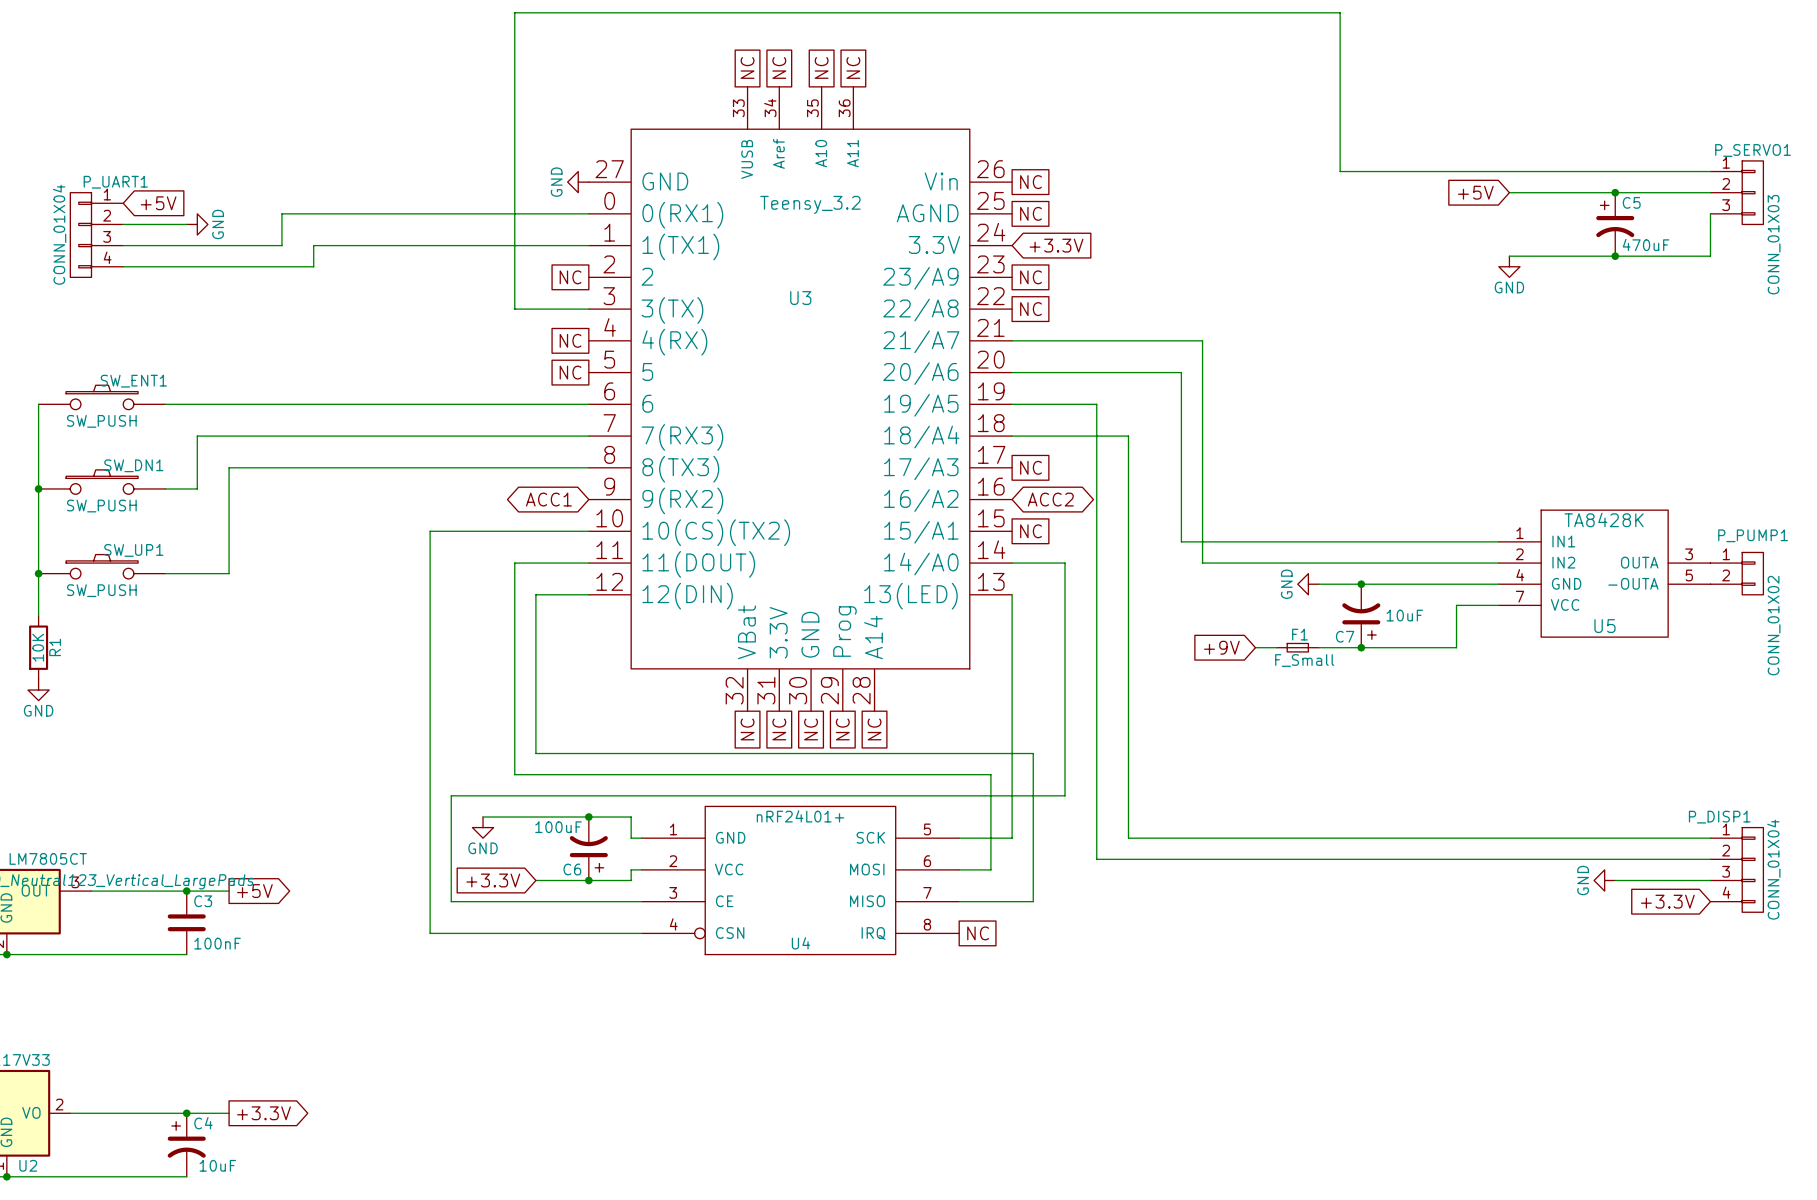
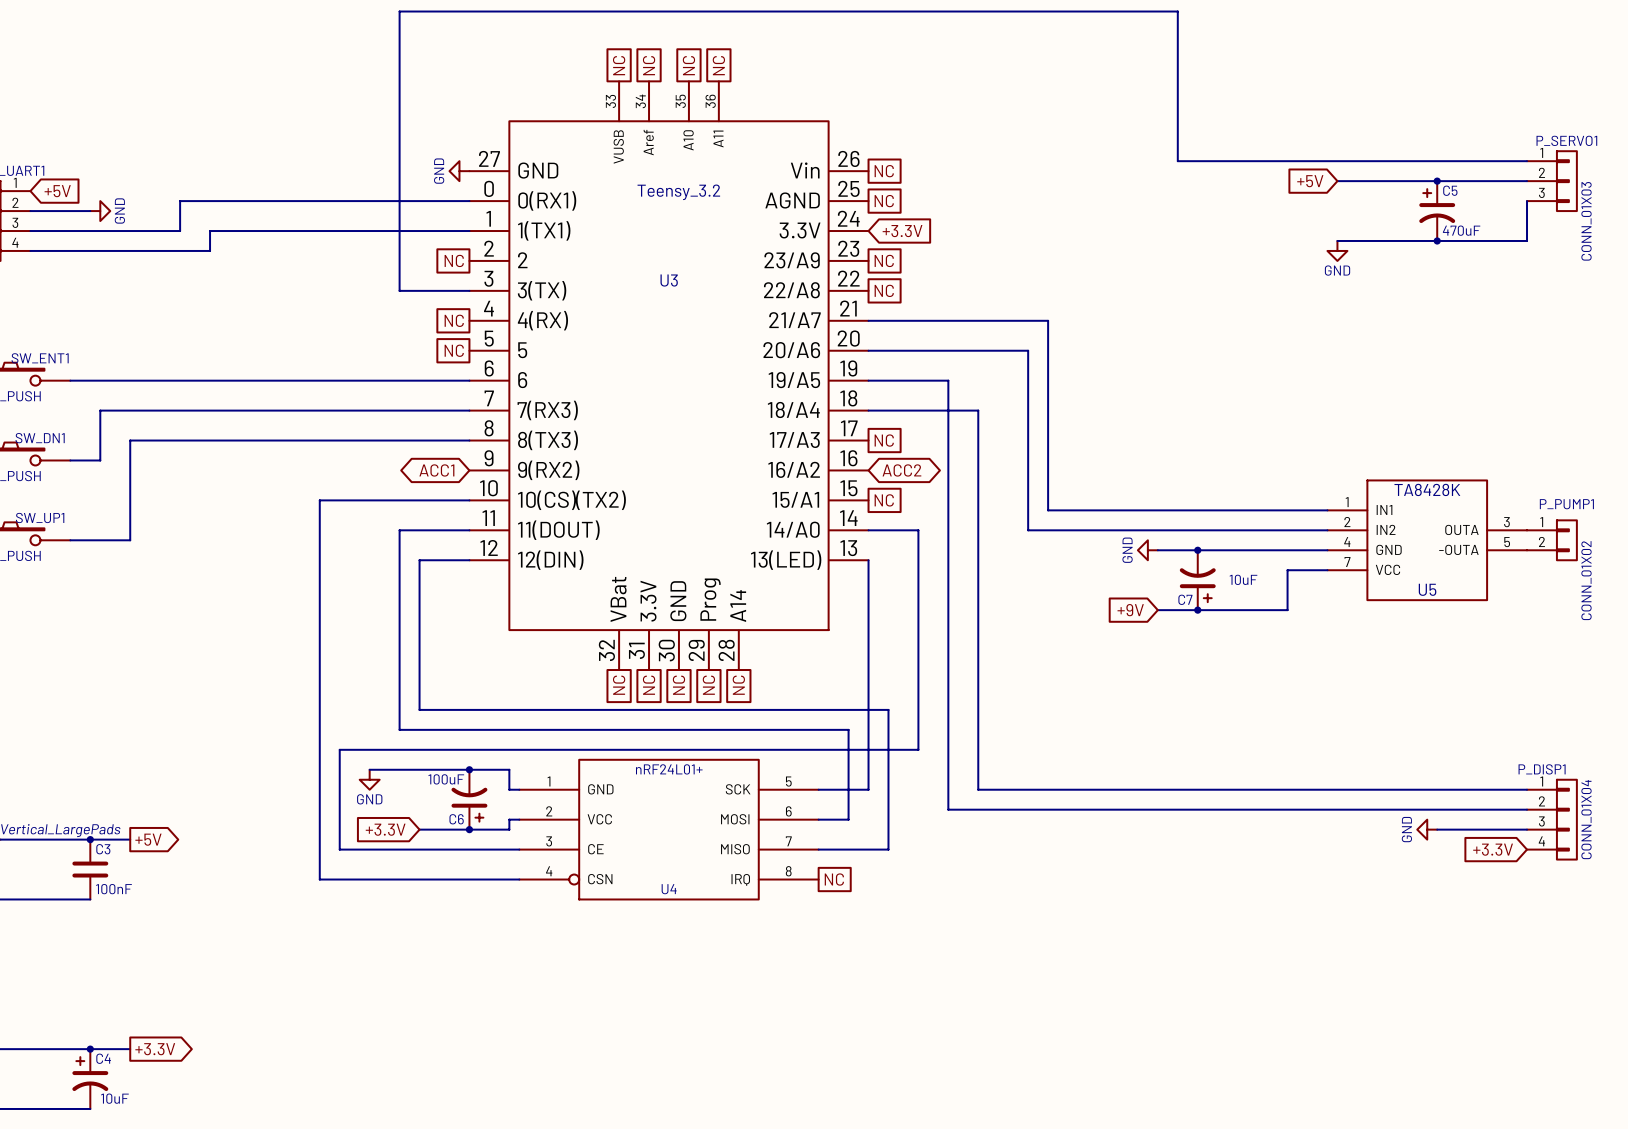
wire: (1181, 541) (1202, 541) (1202, 563) -> (1028, 510) (1028, 530) (1048, 530)
global label position: +9V (1221, 647) -> +9V (1130, 610)
wire: (1255, 647) (1276, 647) -> none
F1: F_Small (1297, 647) -> none

